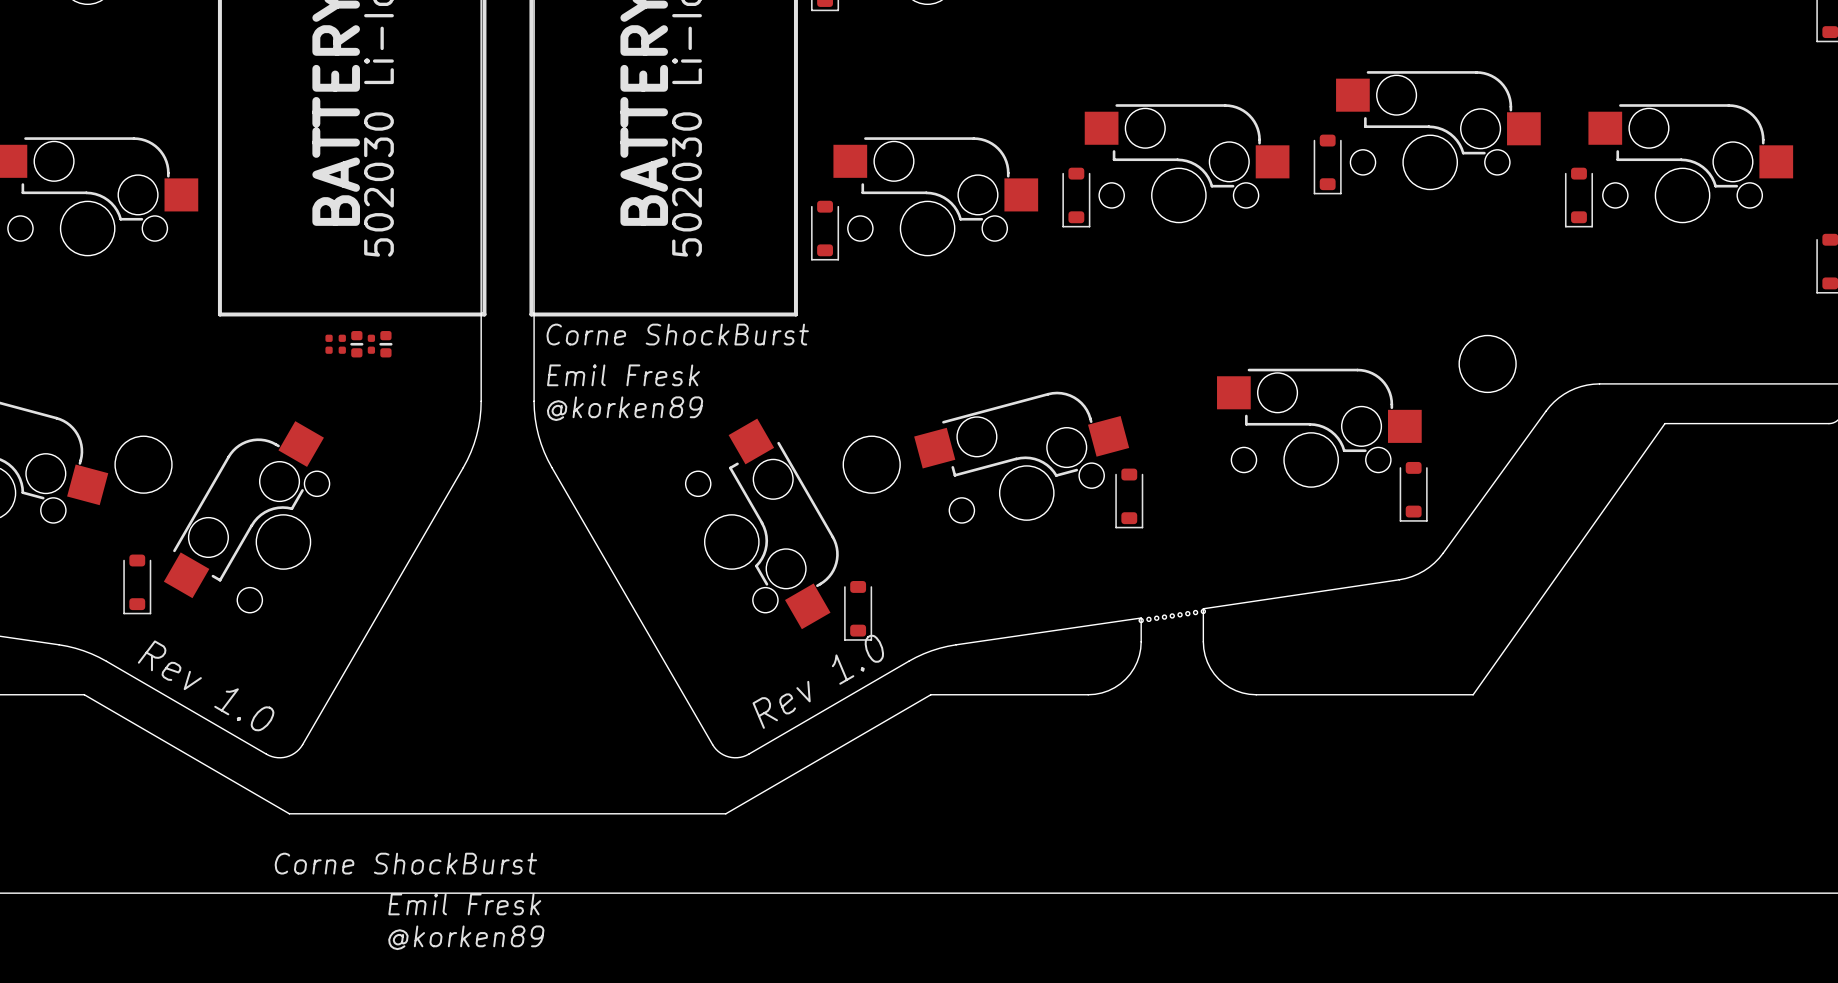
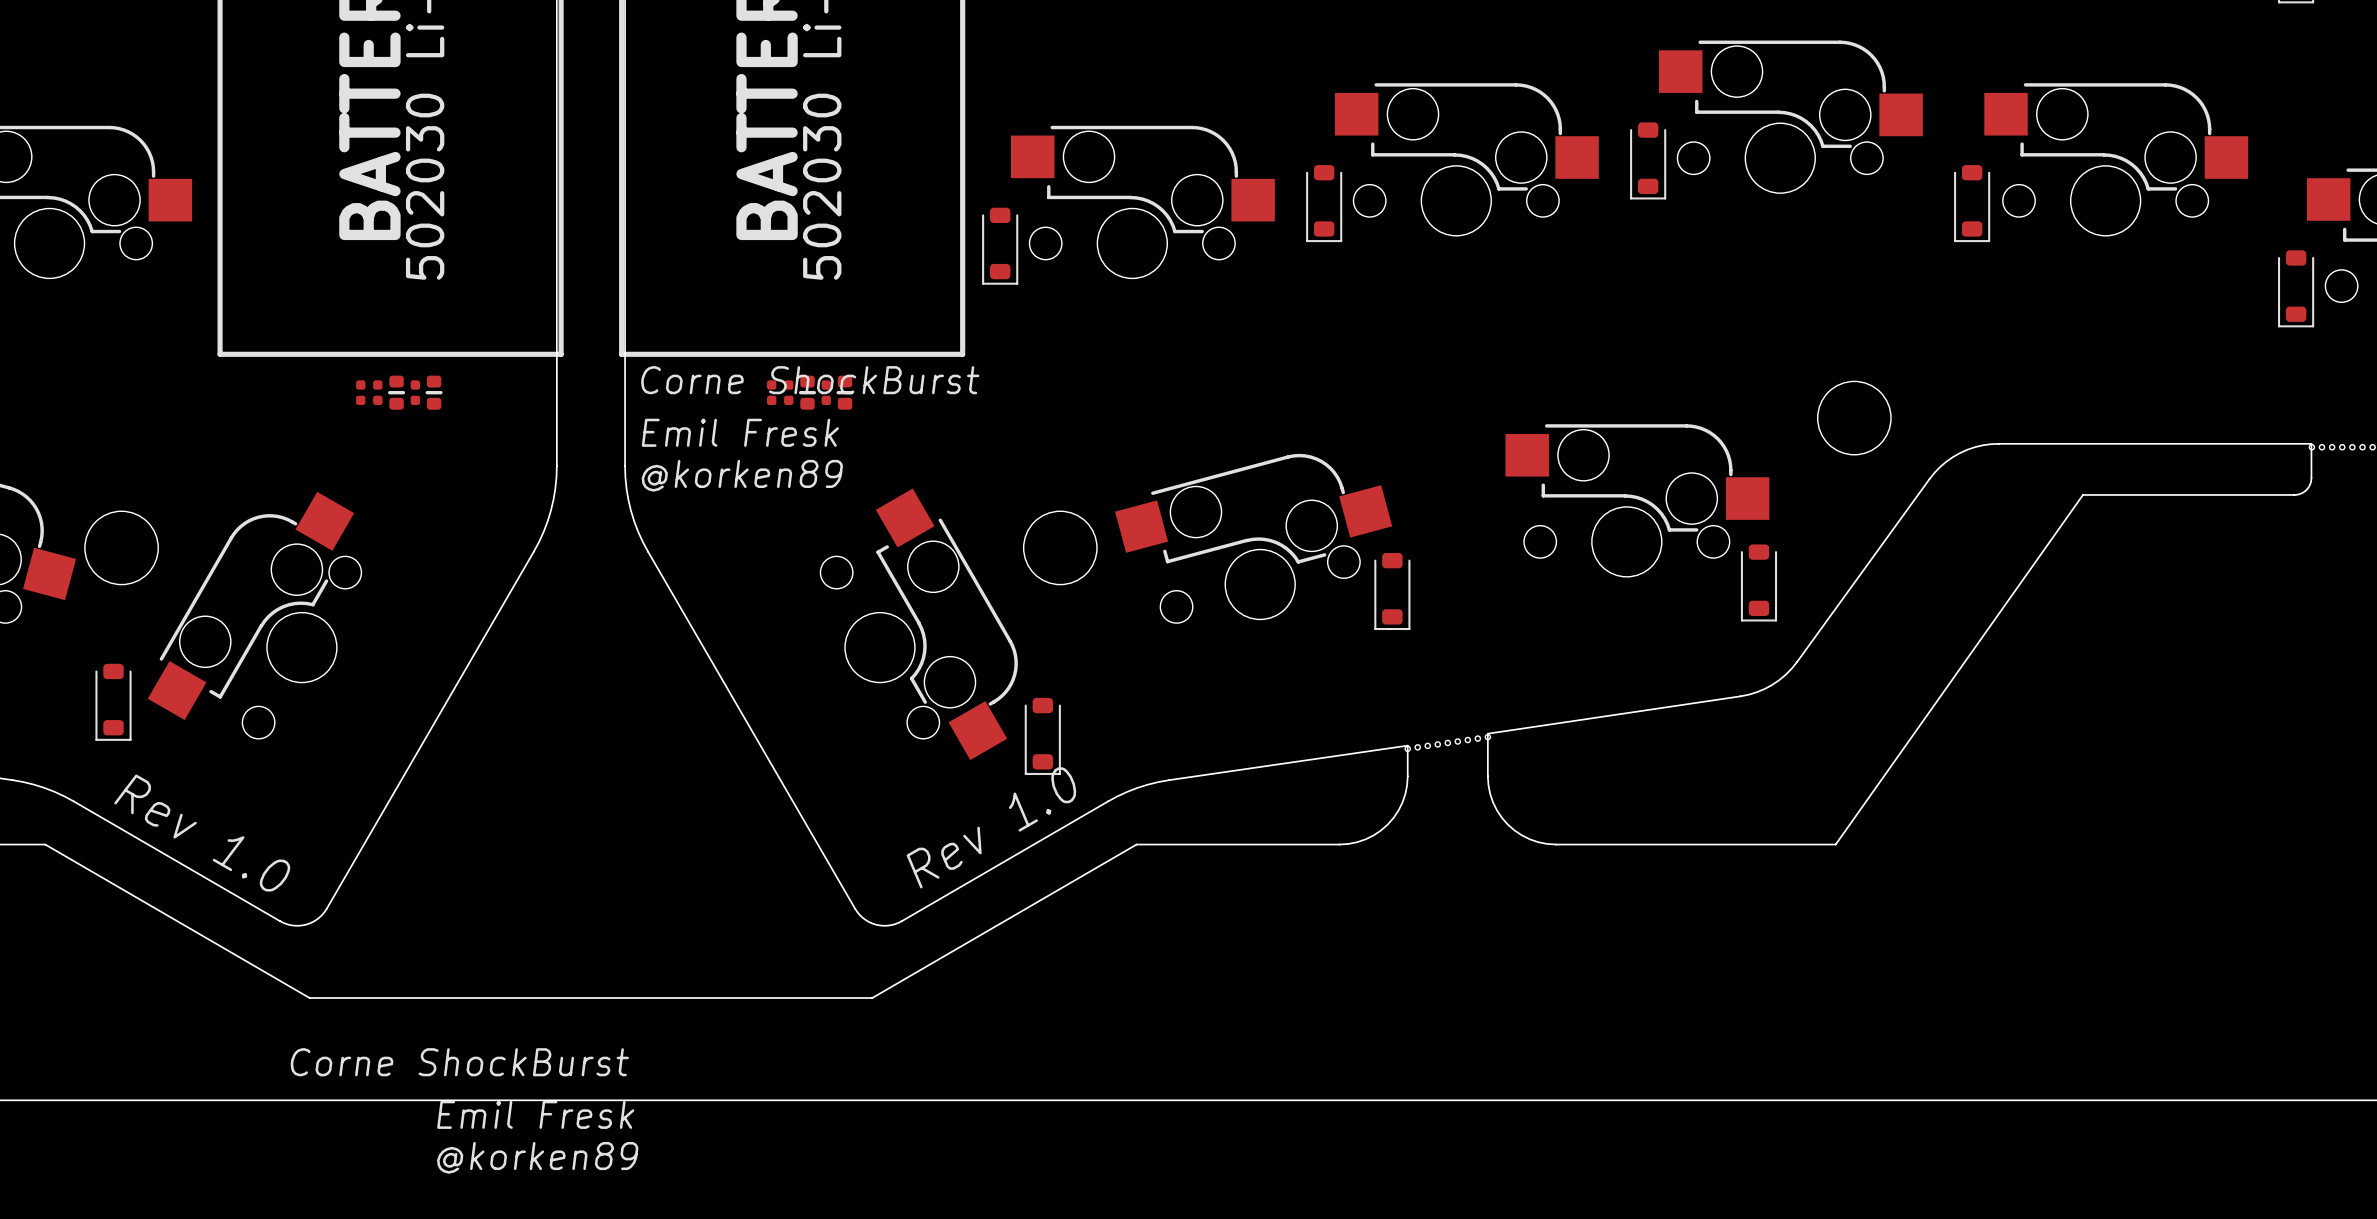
part: none -> (771, 392)
part: none -> (788, 392)
part: none -> (807, 392)
part: none -> (826, 392)
part: none -> (845, 392)

